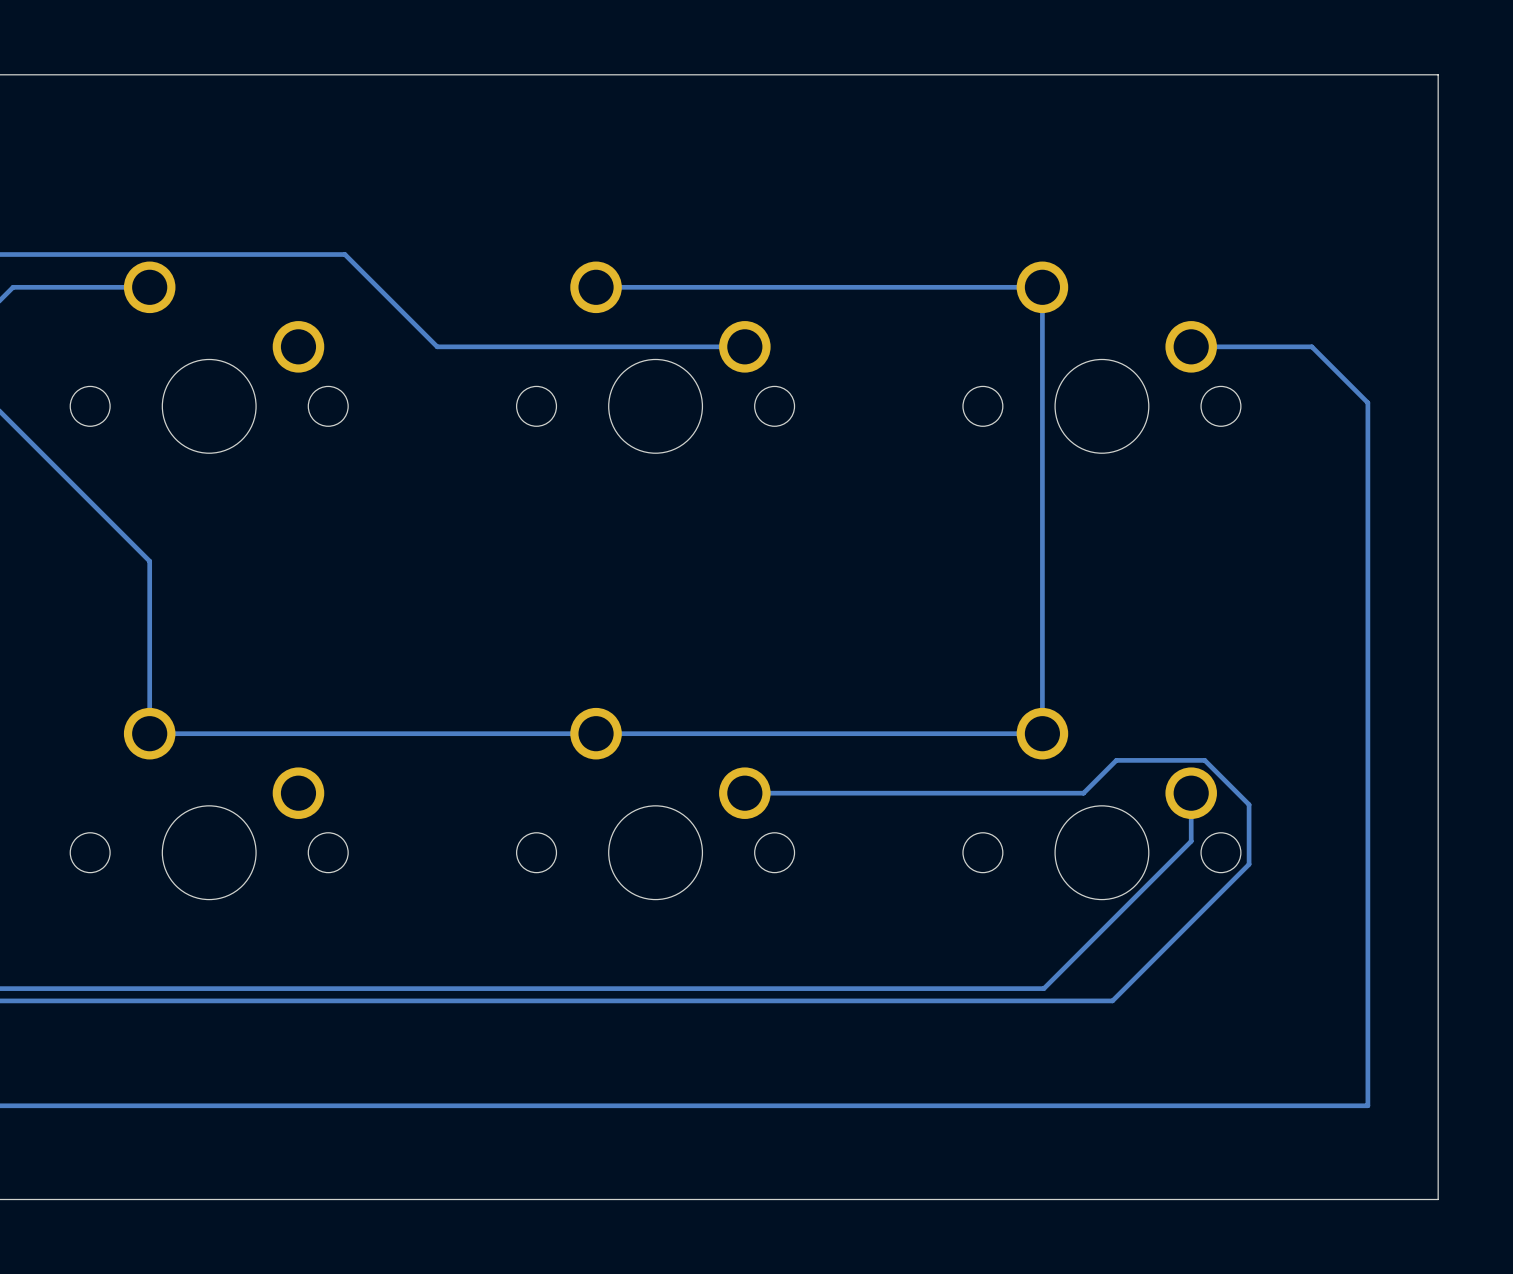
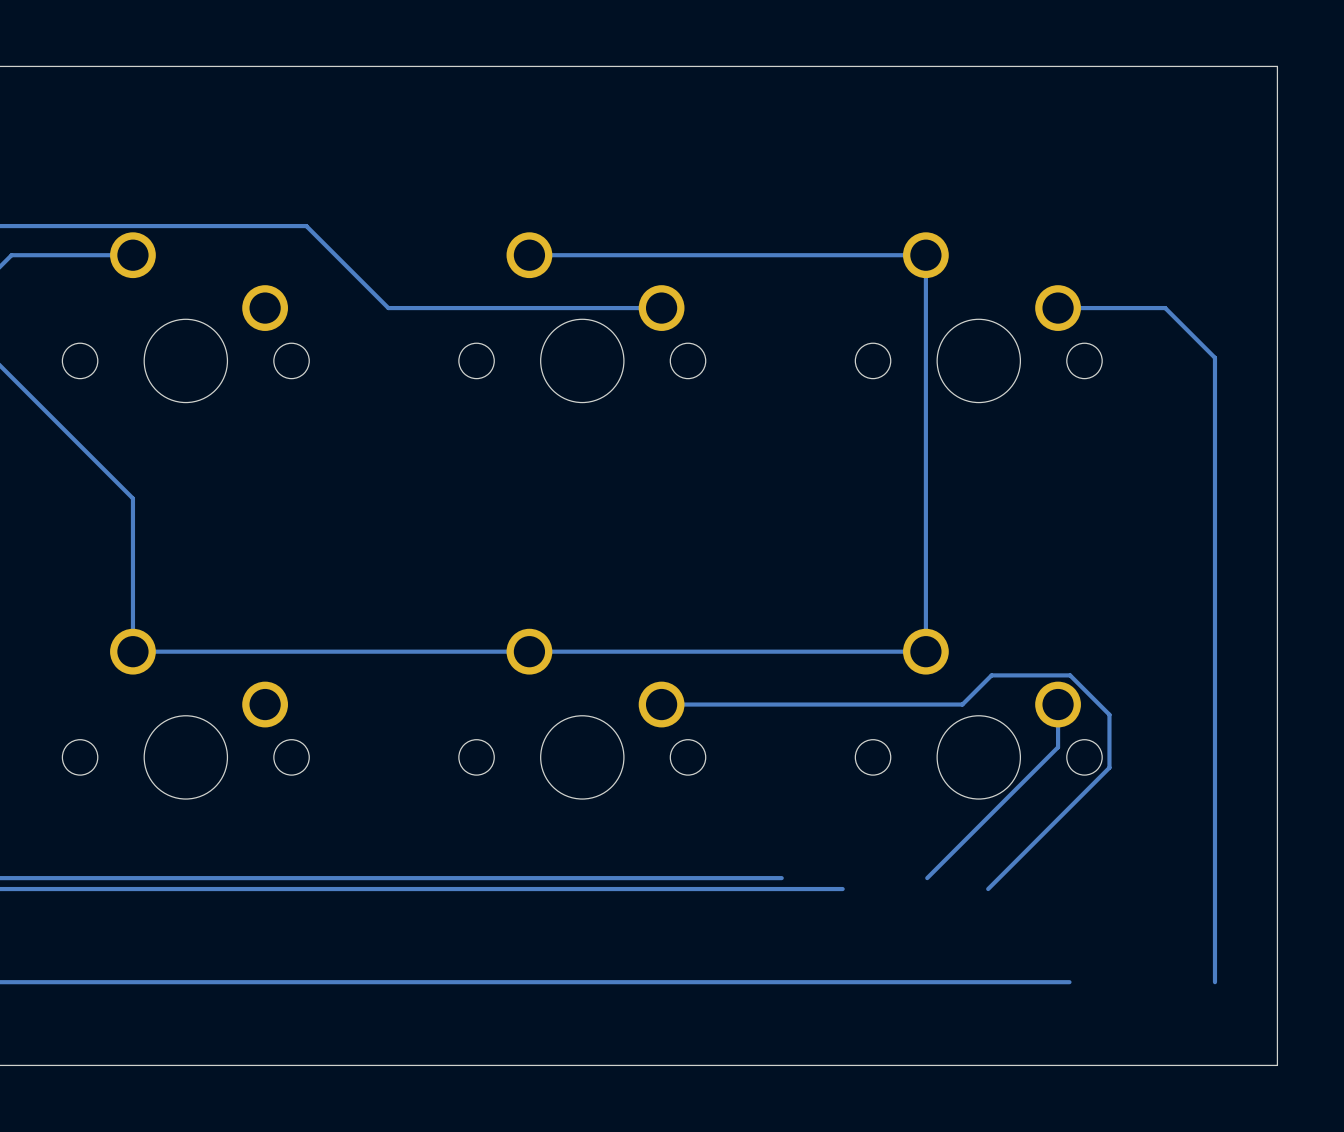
track: (1043, 988) (880, 988) -> none
track: (1112, 1000) (948, 1000) -> none
track: (1367, 1105) (1204, 1105) -> none

